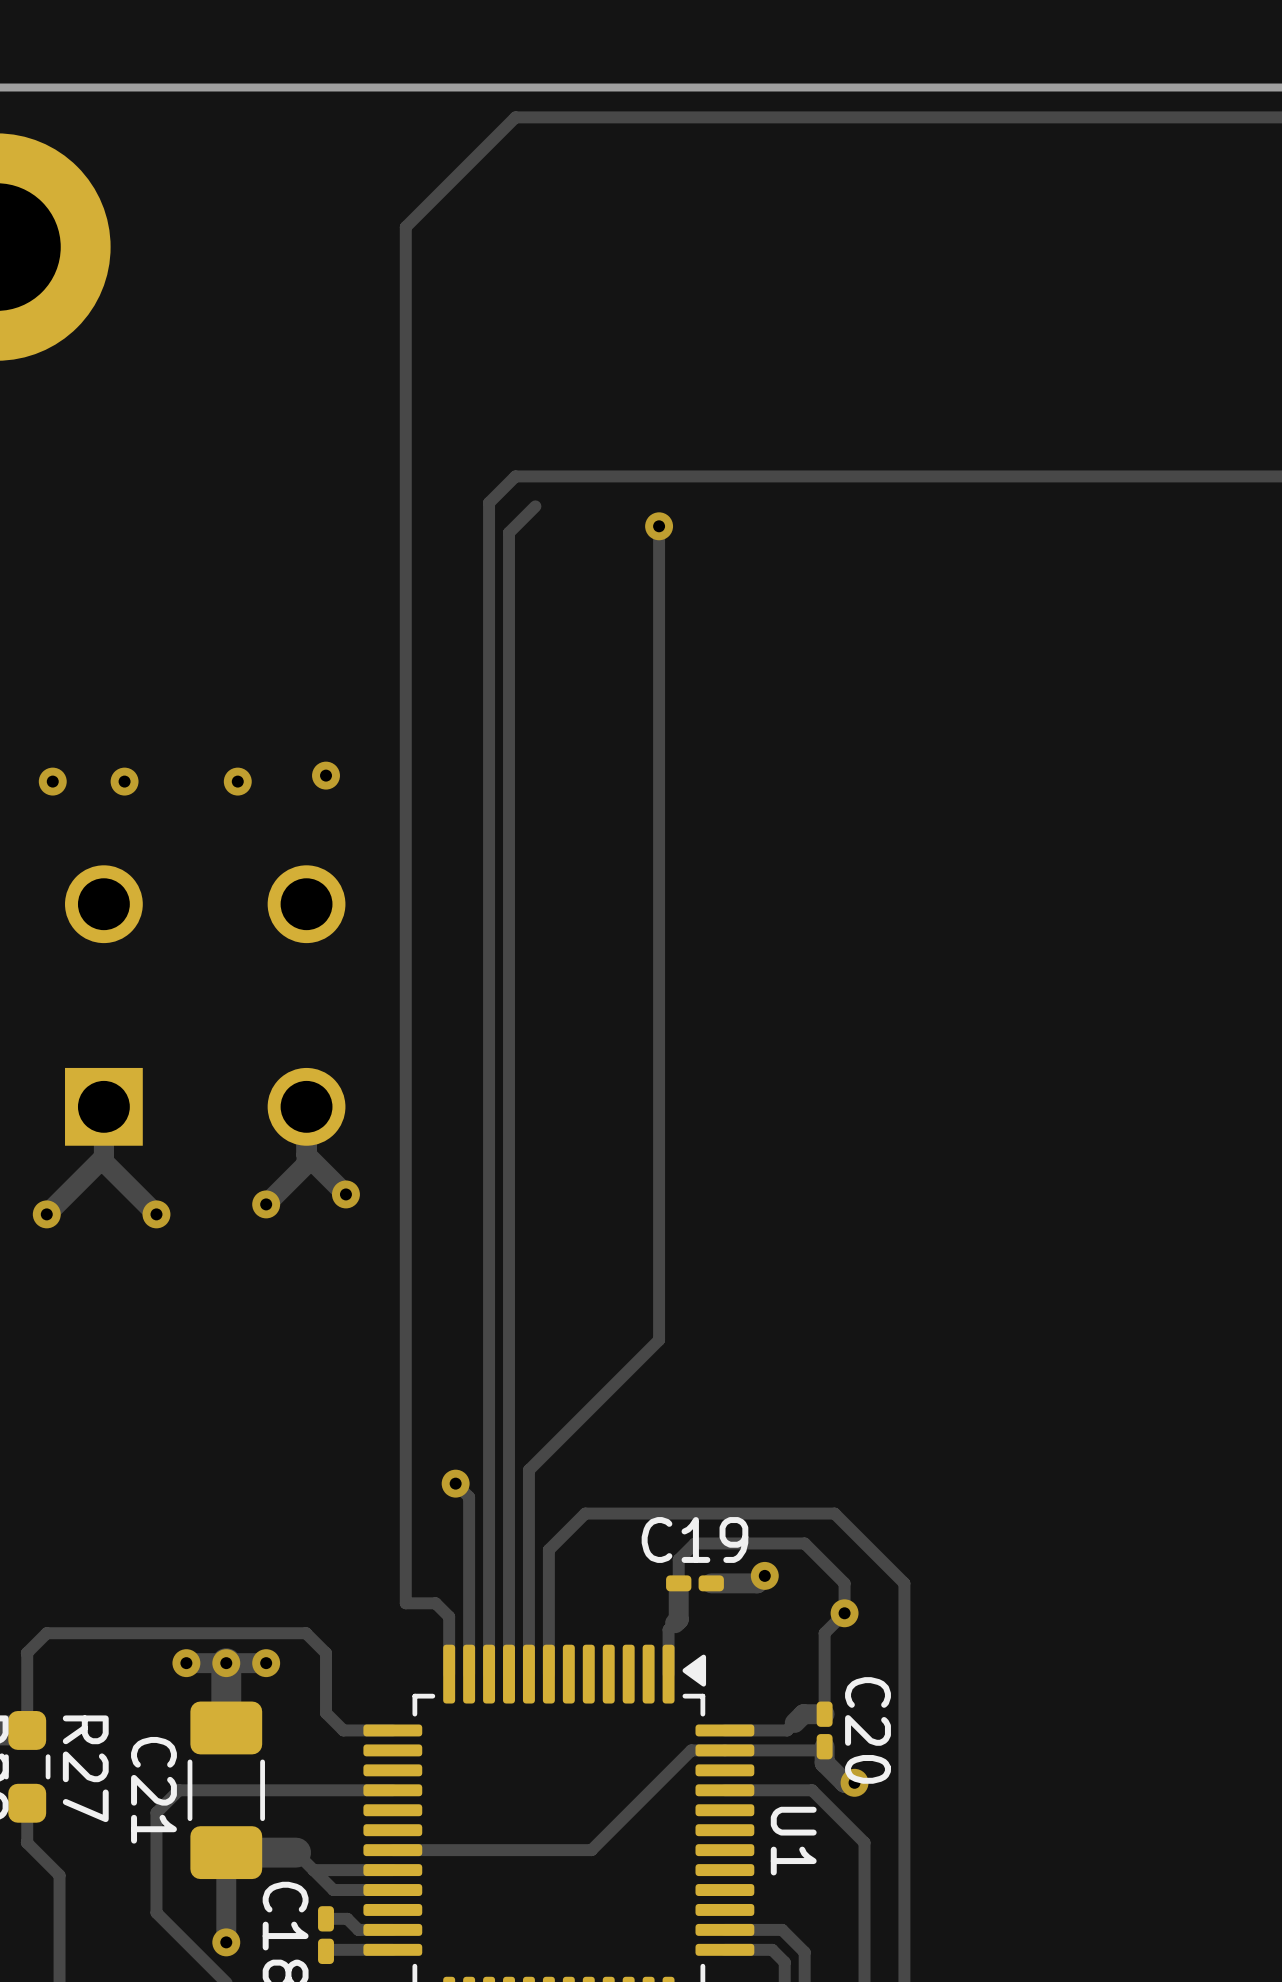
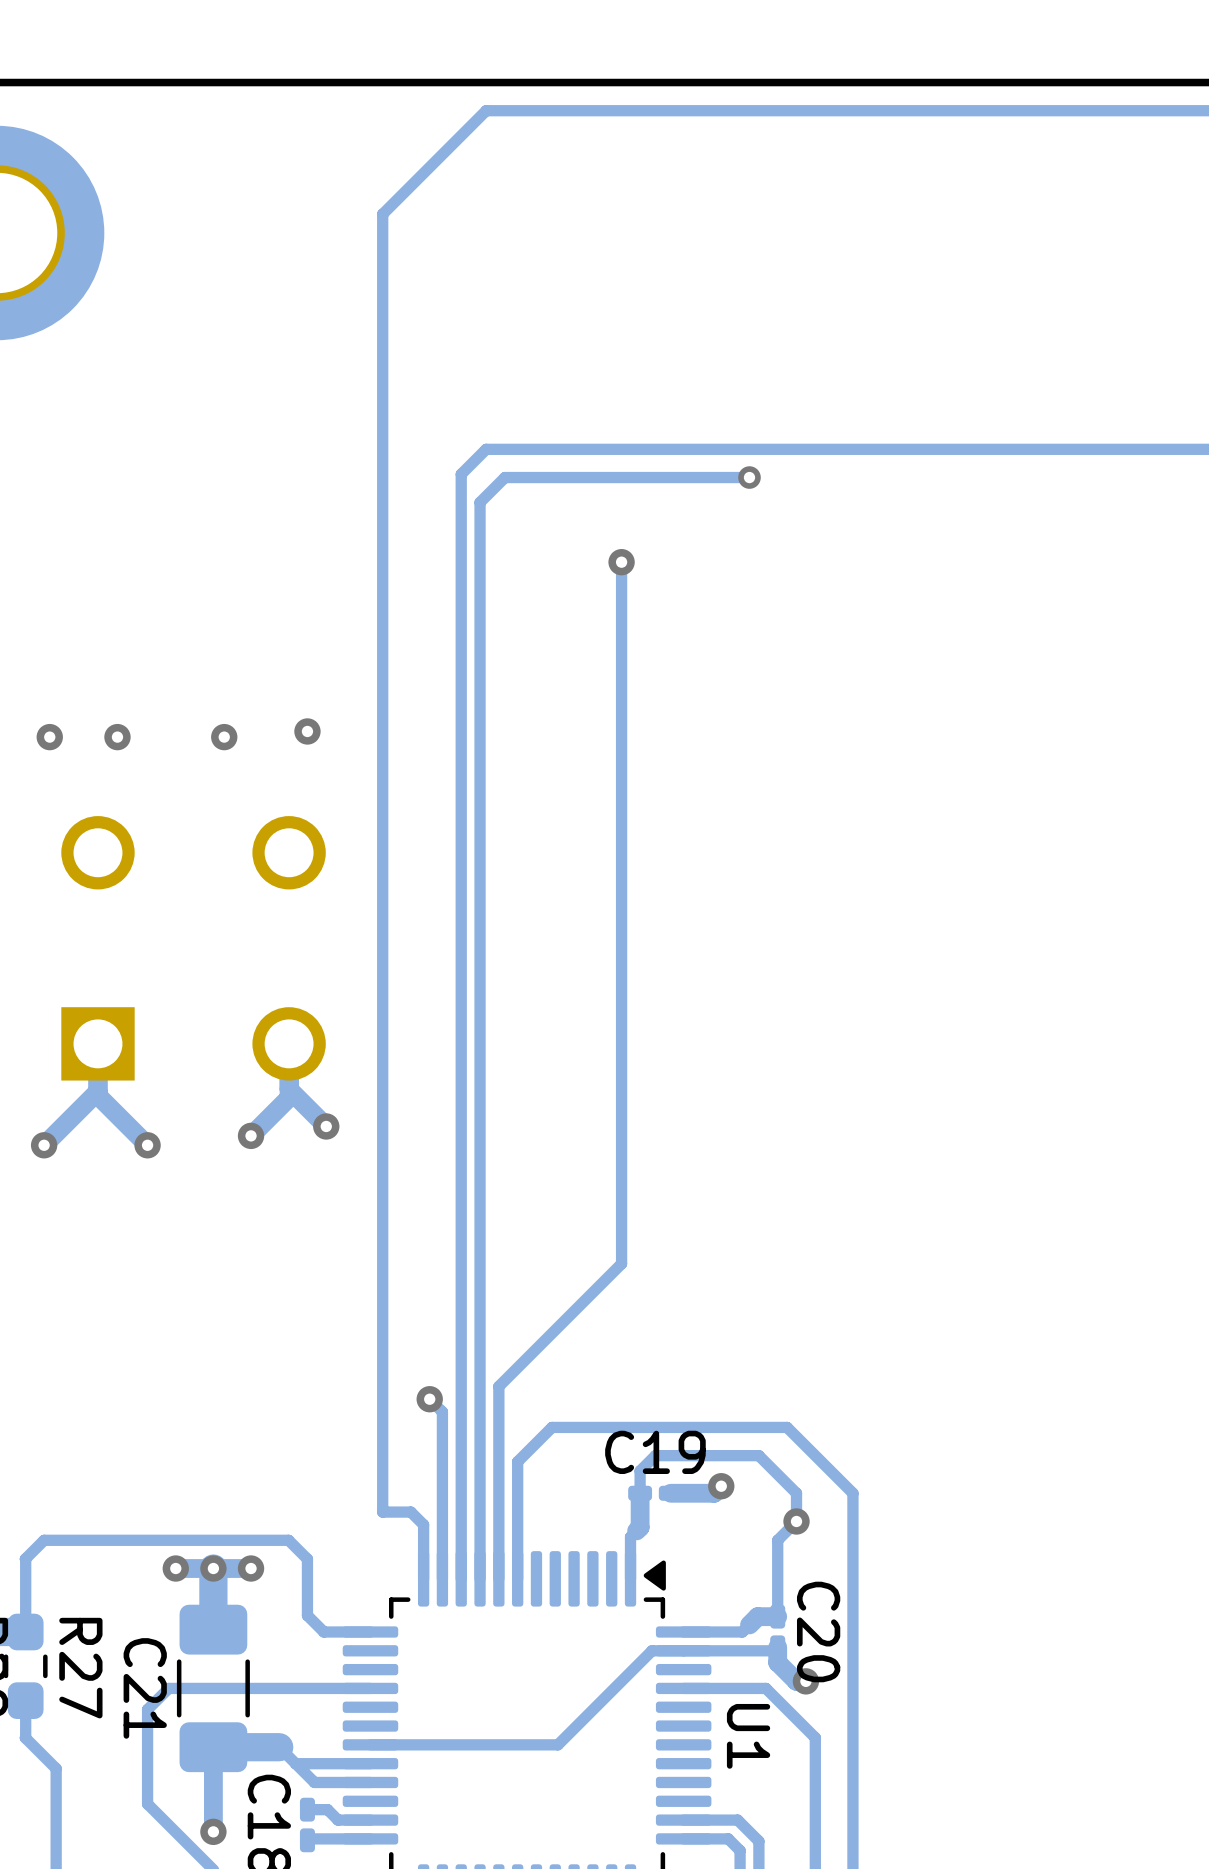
track: none -> (749, 477) (504, 477)
via: none -> (749, 477)
track: (659, 526) (659, 596) -> none
via position: (659, 526) -> (621, 562)

